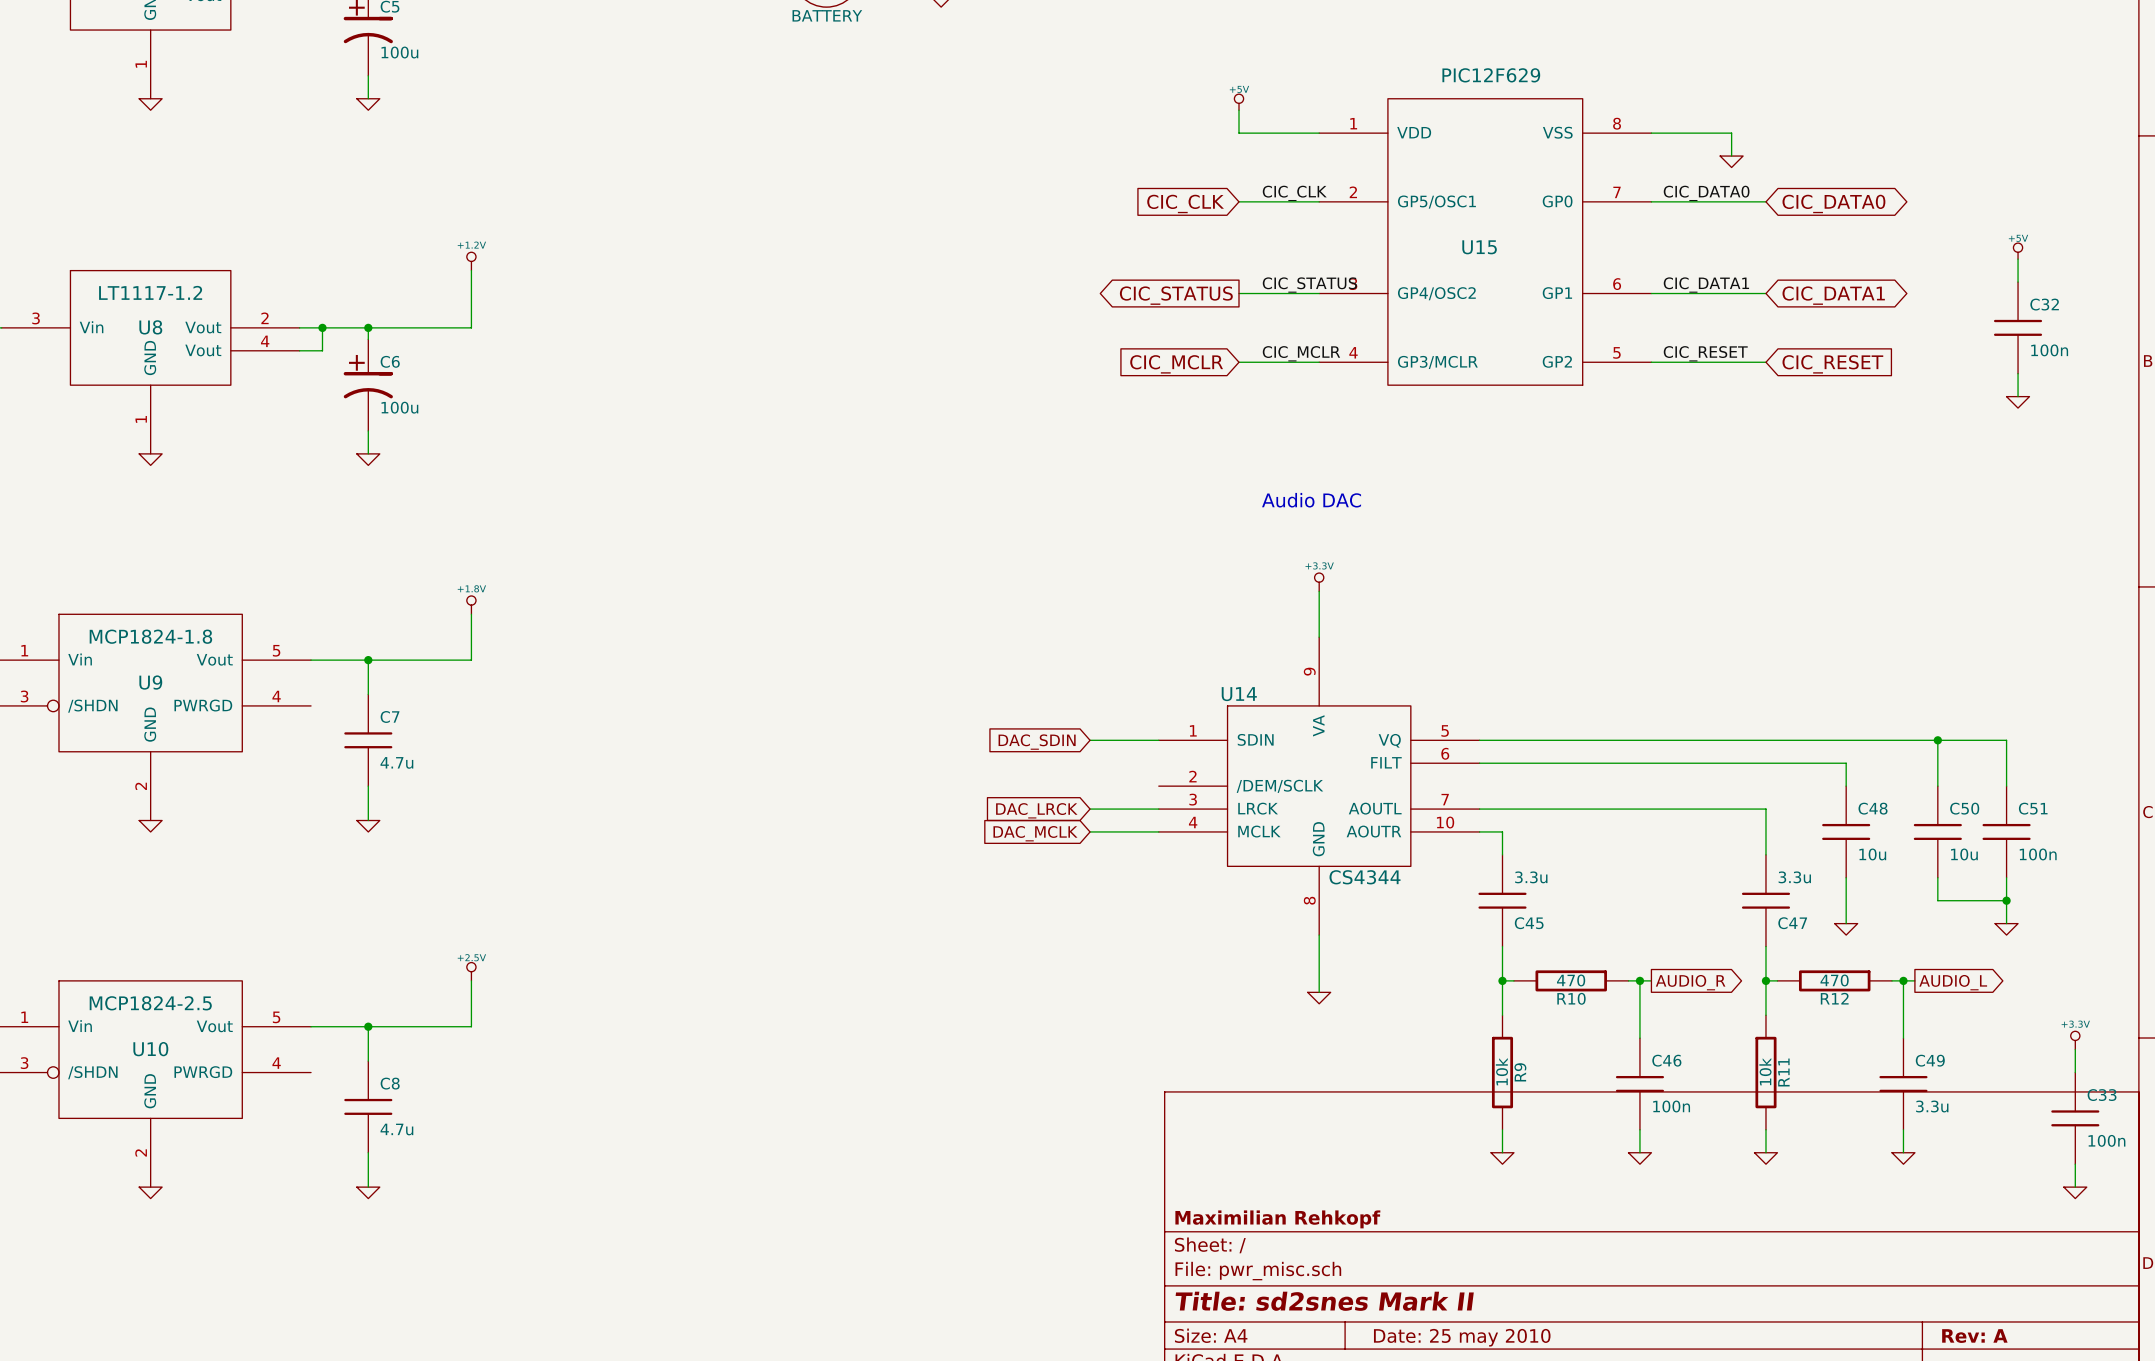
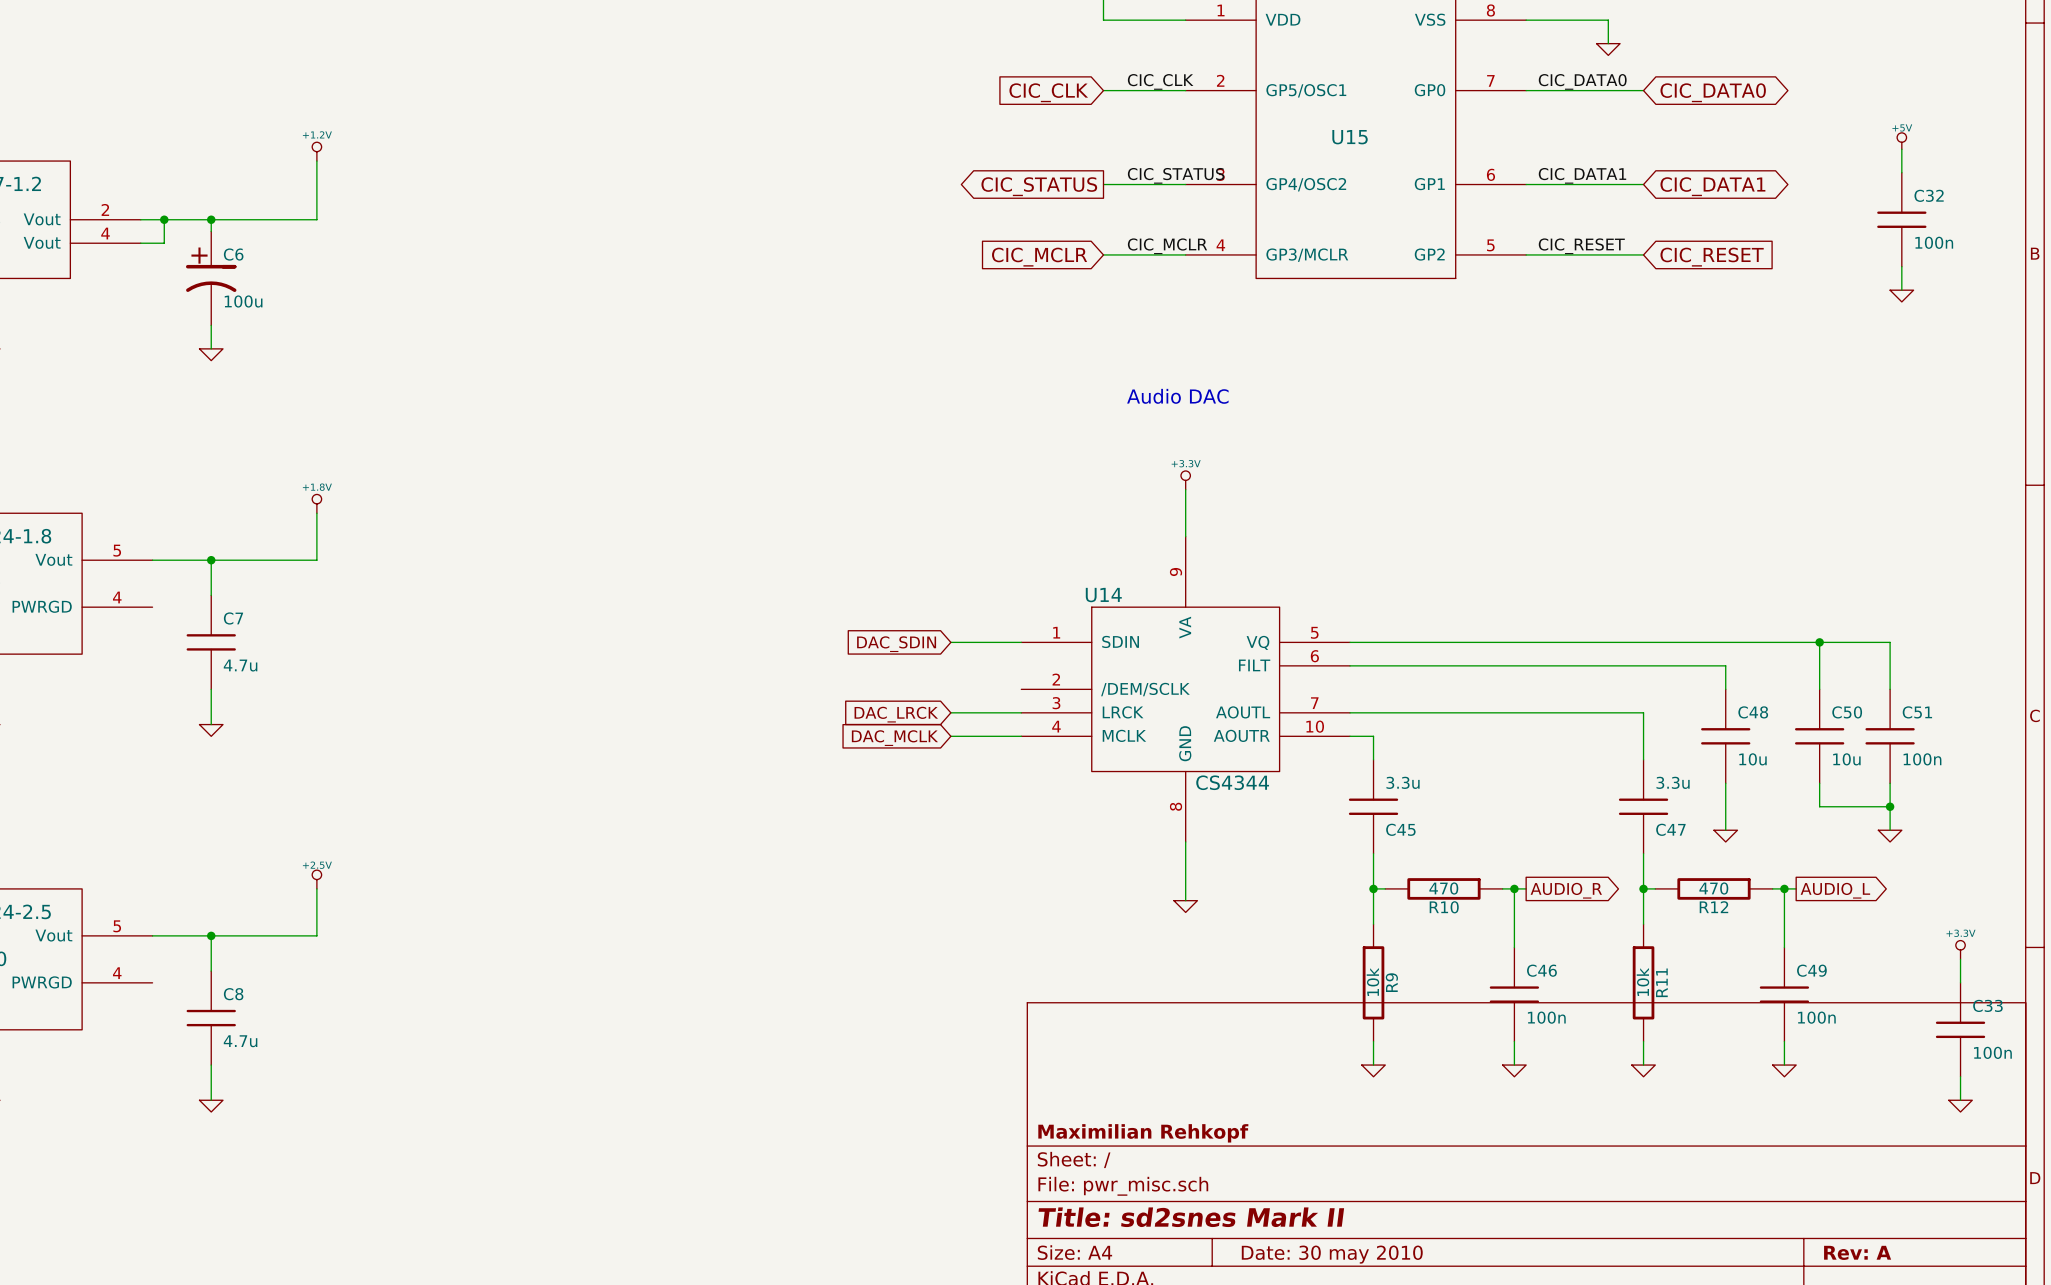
C49 value: 3.3u (1932, 1106) -> 100n (1816, 1017)
title block: Date: 25 may 2010 (1462, 1337) -> Date: 30 may 2010 (1332, 1254)

